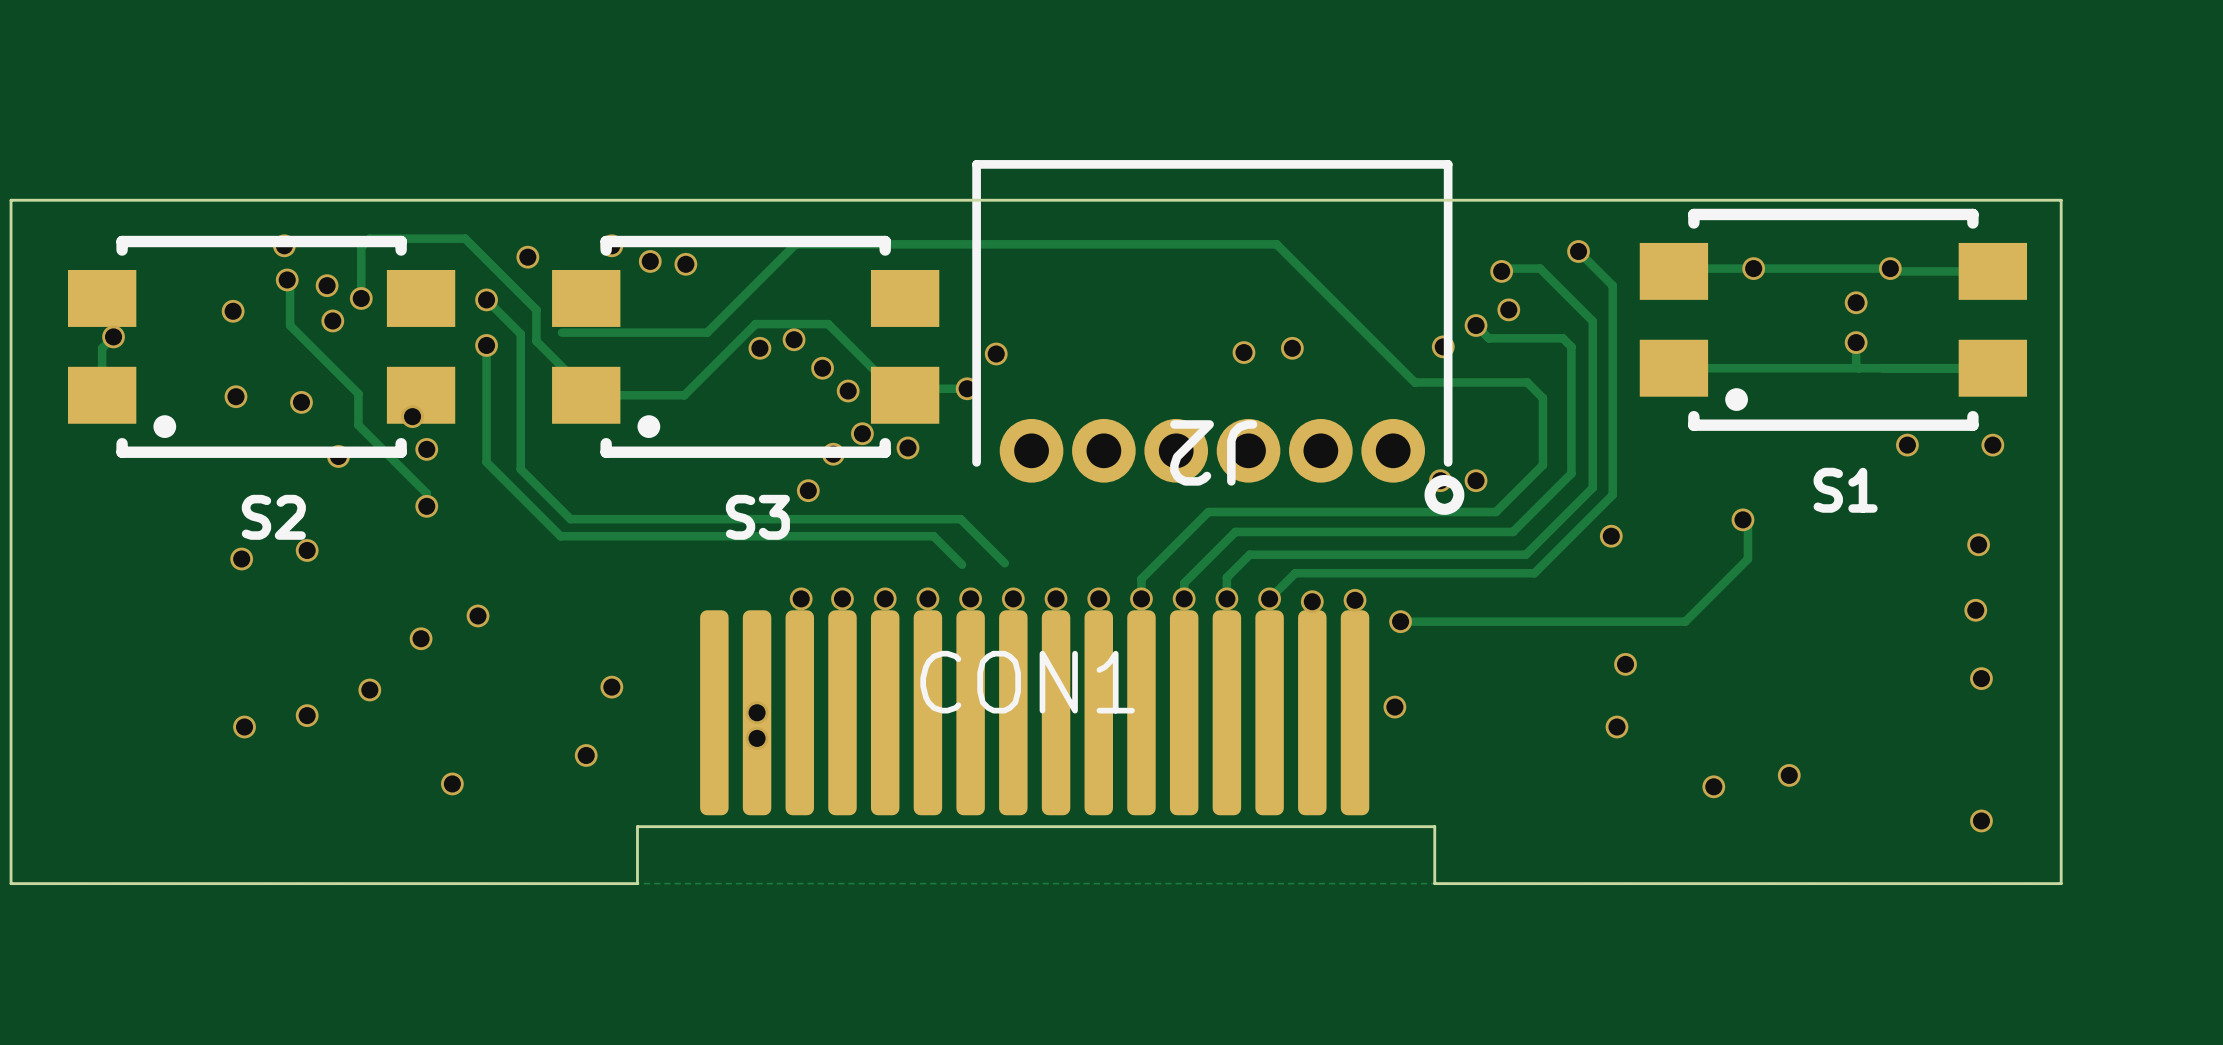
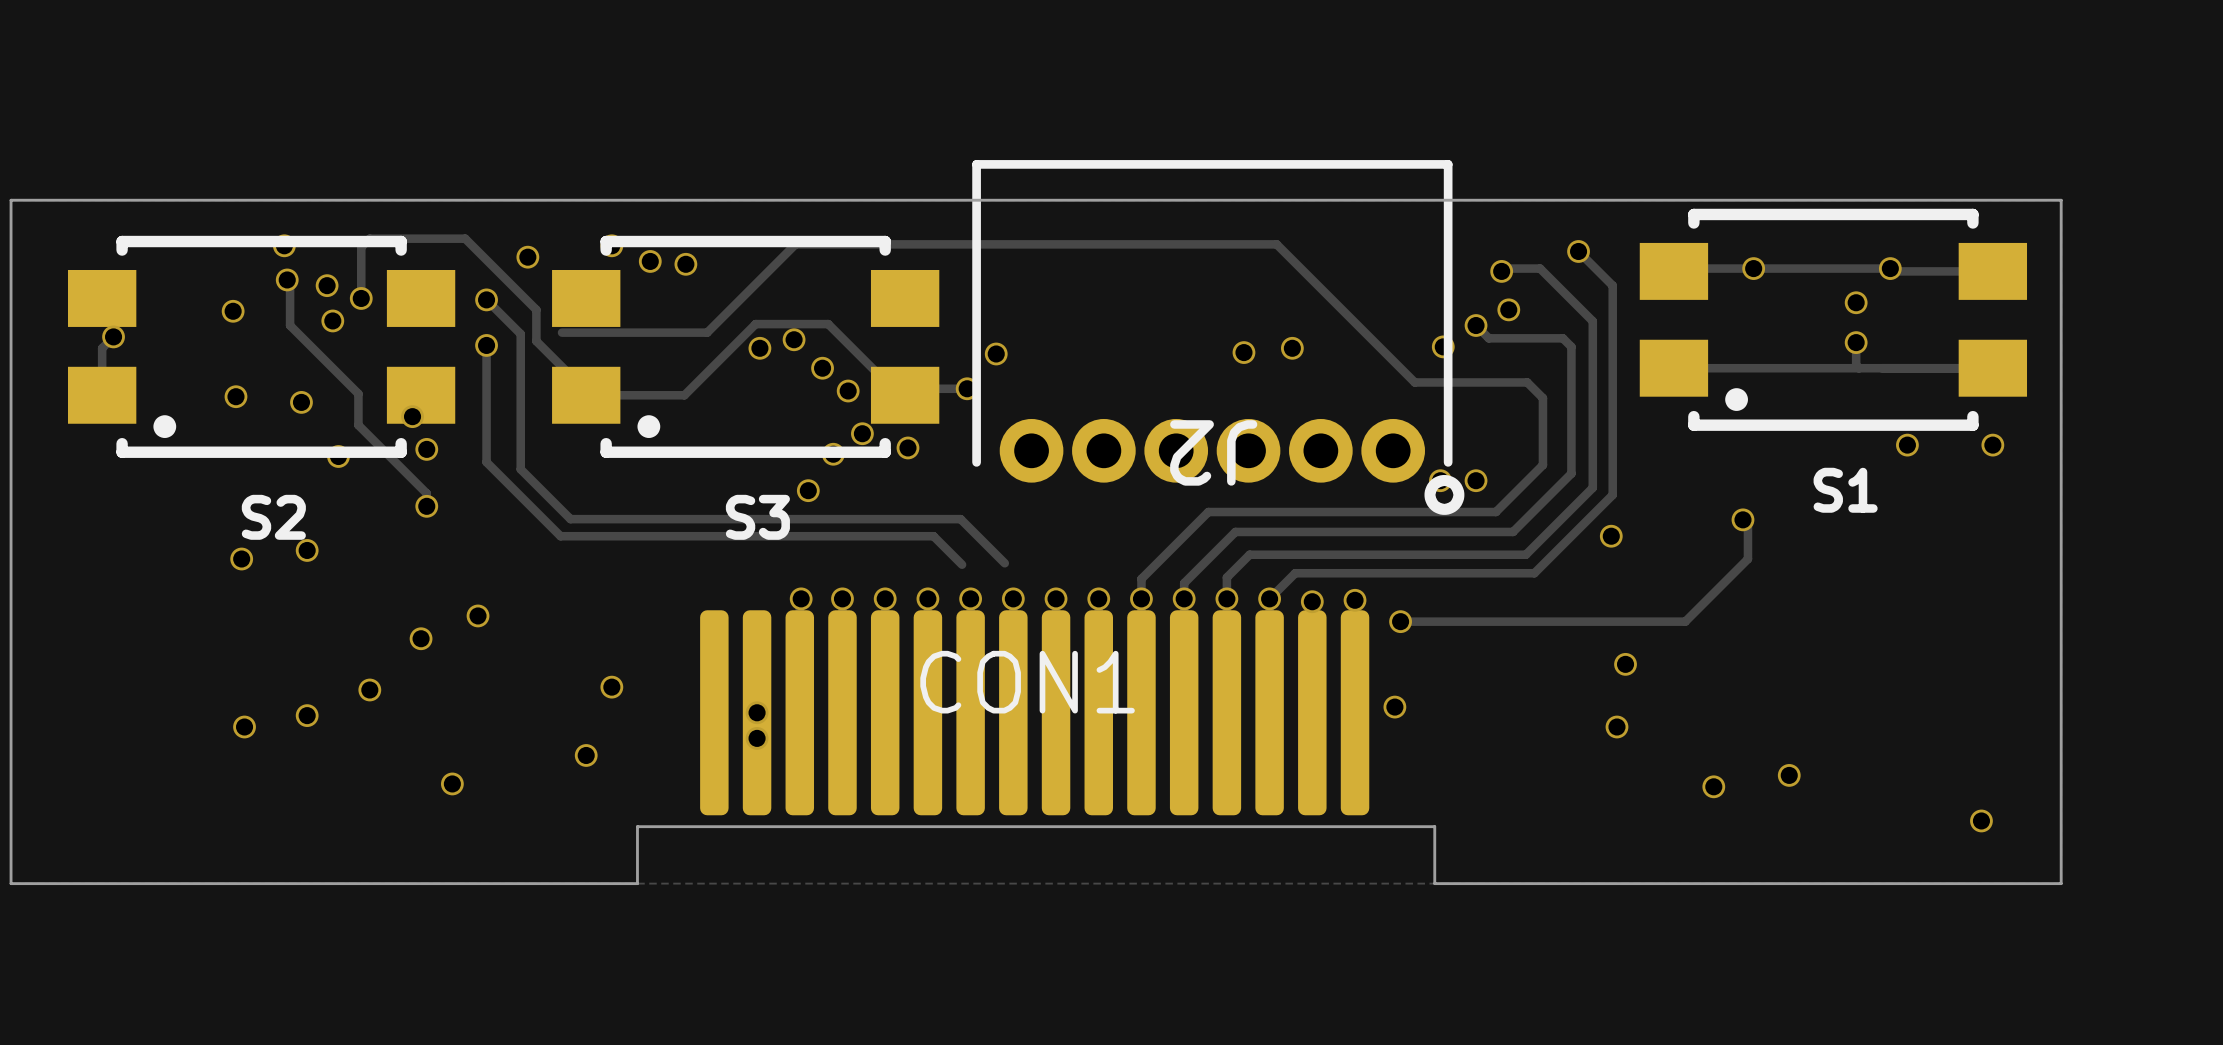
via: (1978, 544) -> none
via: (1975, 610) -> none
via: (1981, 678) -> none

